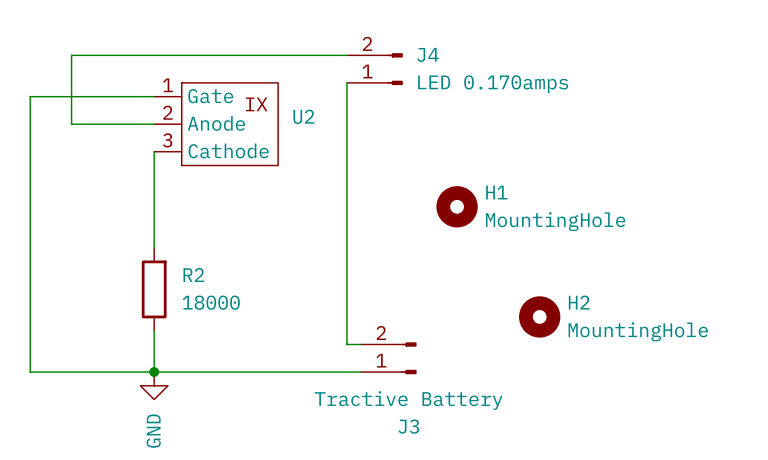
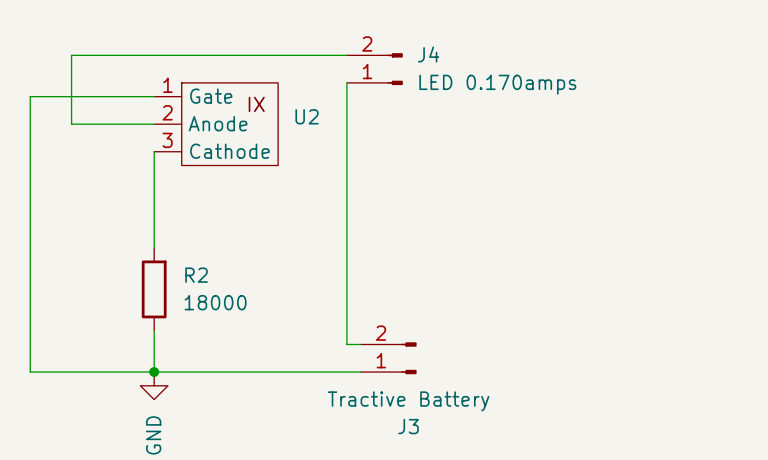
H1: MountingHole (457, 206) -> none
H2: MountingHole (539, 316) -> none

